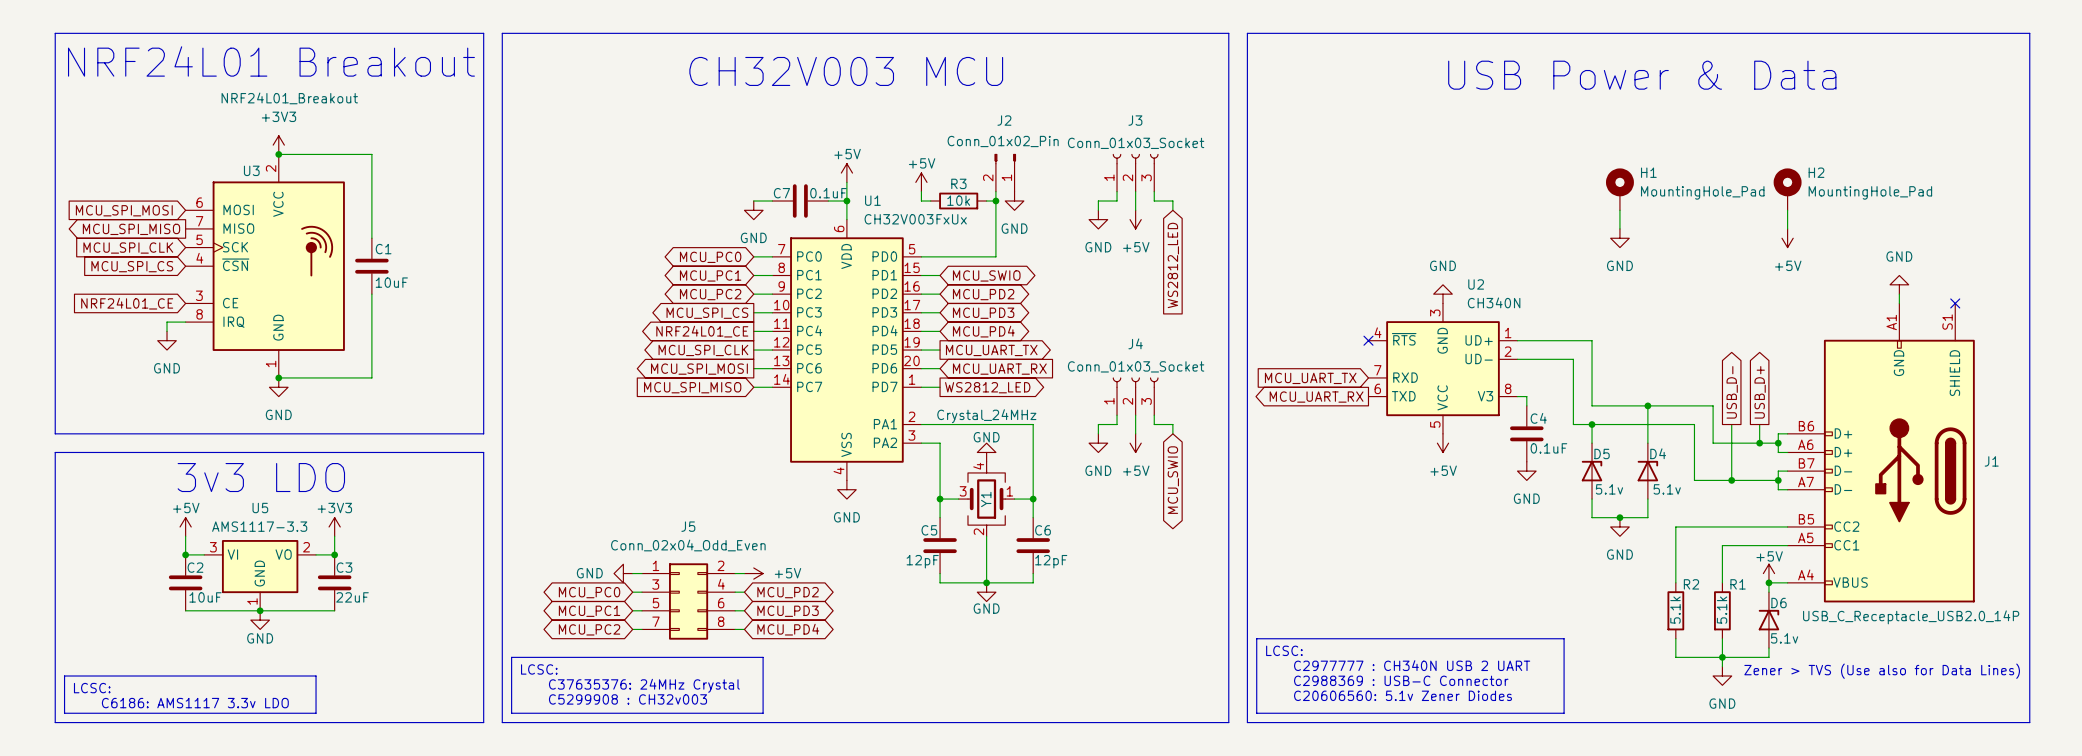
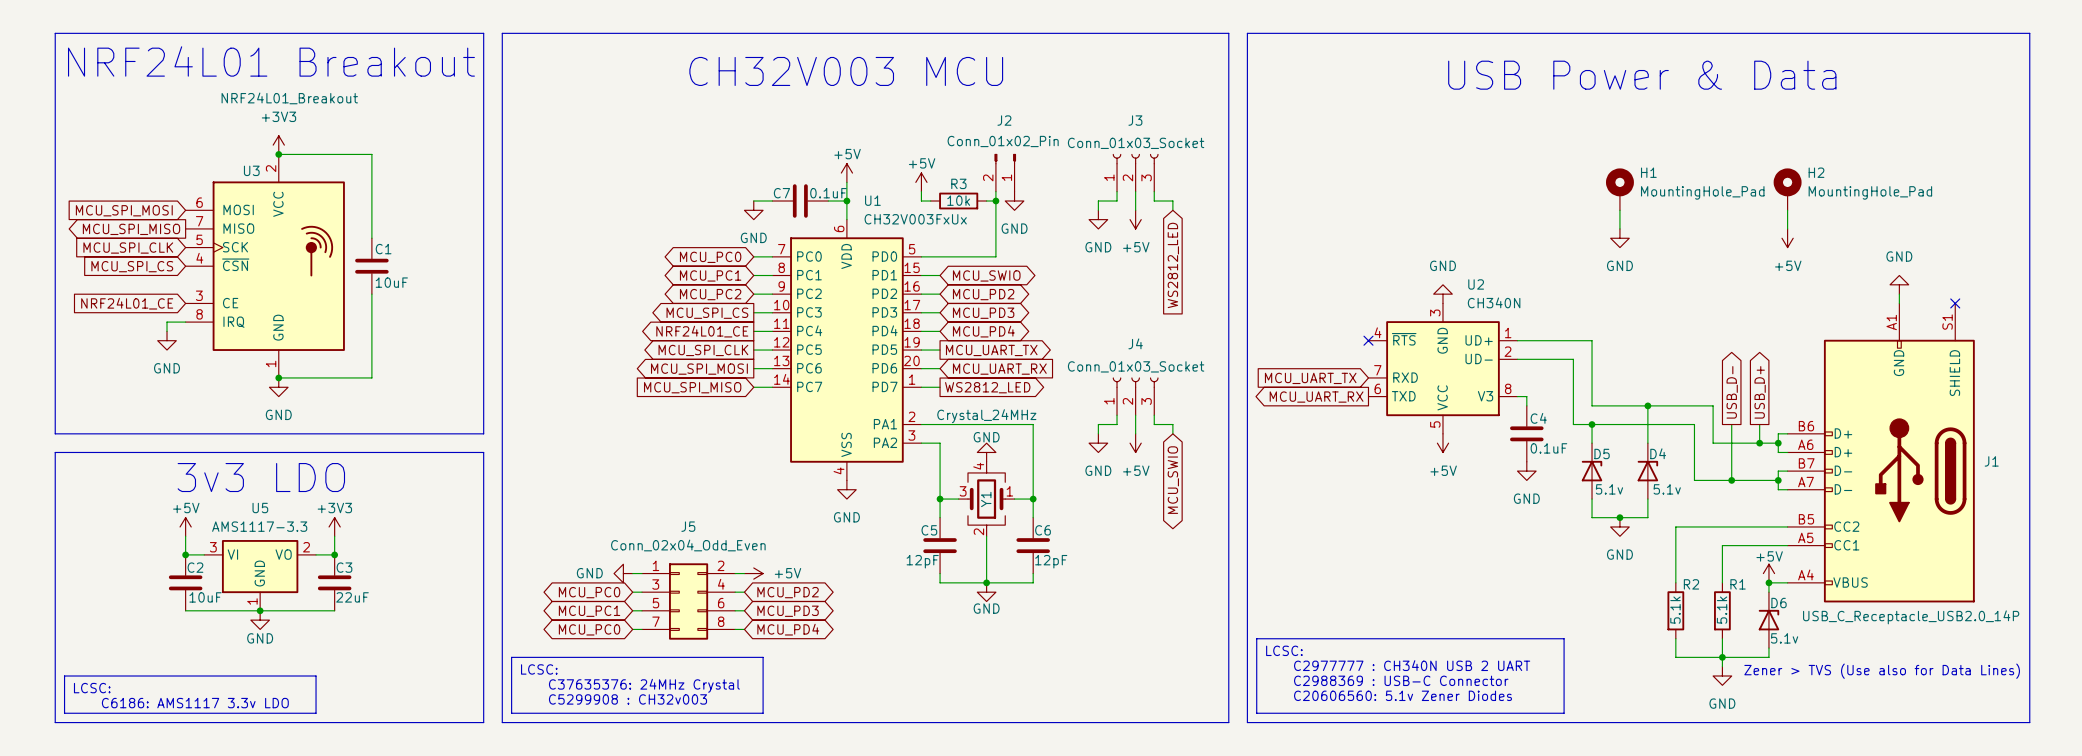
global label: MCU_PC2 (589, 629) -> MCU_PC0 (589, 629)

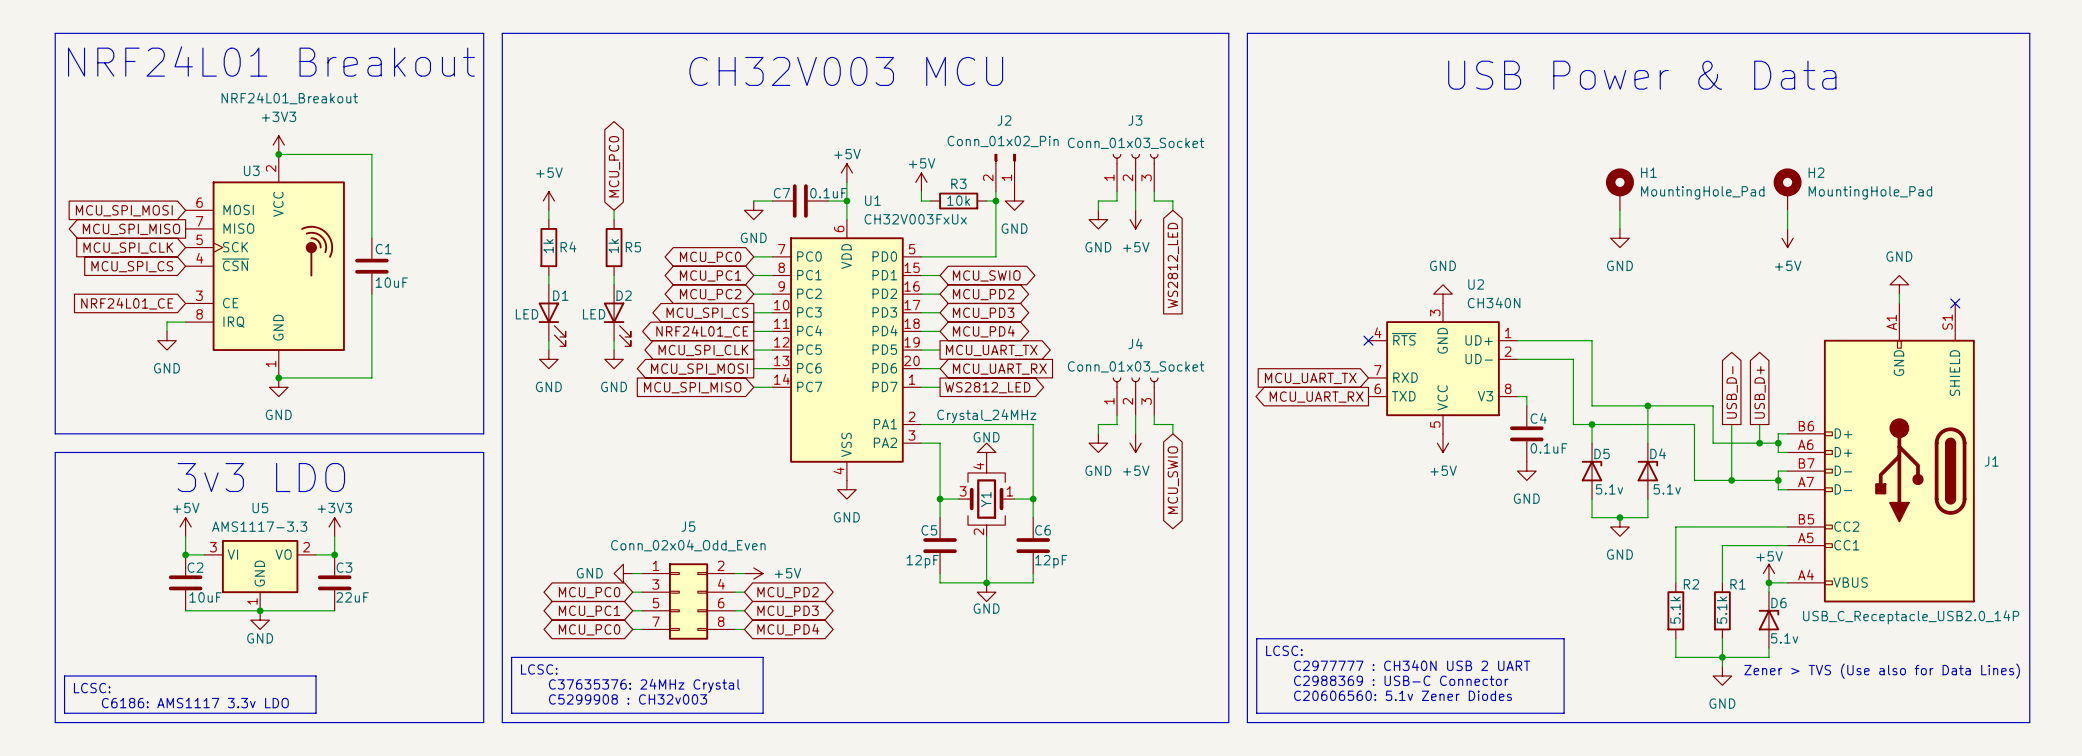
global label: none -> MCU_PC0 (614, 166)
power symbol: none -> +5V (548, 201)
wire: none -> (548, 210) (548, 219)
wire: none -> (614, 210) (614, 219)
R4: none -> 1k (548, 247)
R5: none -> 1k (614, 247)
wire: none -> (548, 275) (548, 284)
wire: none -> (614, 275) (614, 284)
D1: none -> LED (552, 315)
D2: none -> LED (617, 315)
wire: none -> (548, 340) (548, 350)
wire: none -> (614, 340) (614, 350)
power symbol: none -> GND (548, 359)
power symbol: none -> GND (614, 359)

